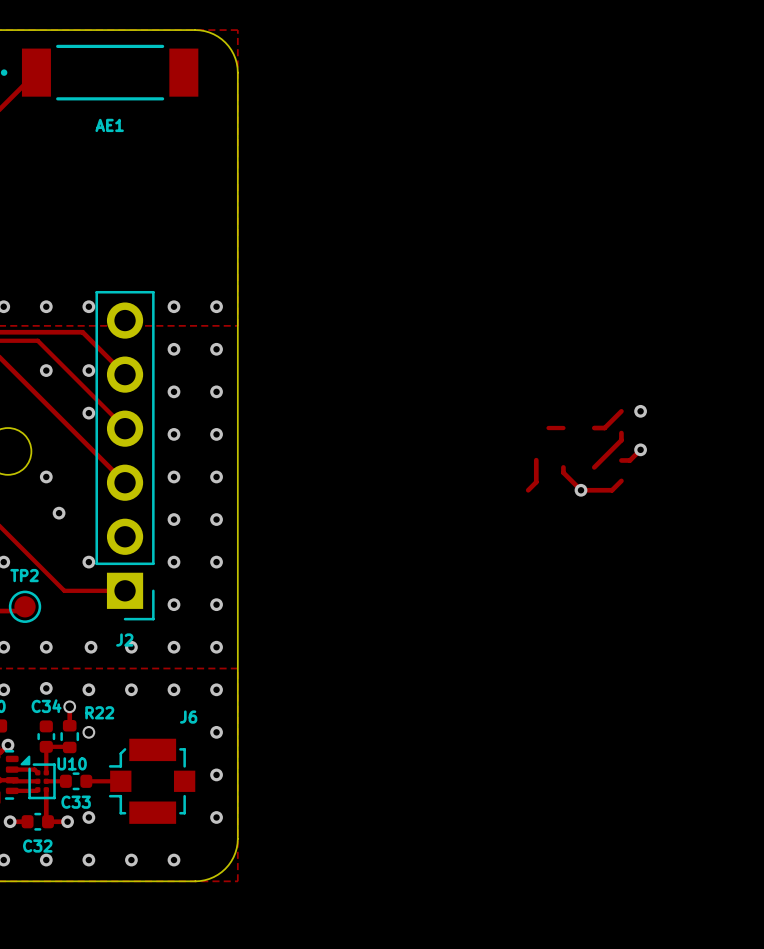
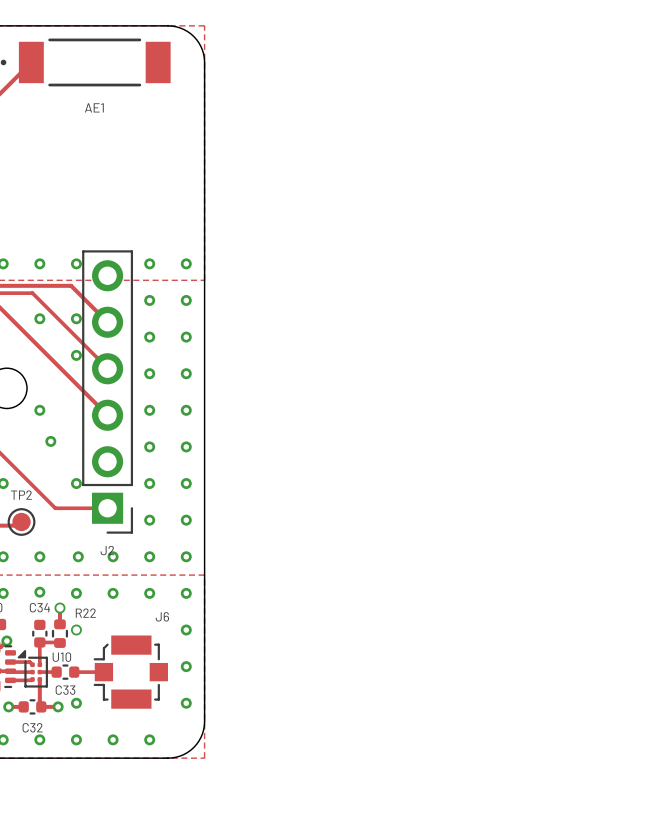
track: (621, 411) (604, 428) (594, 428) -> none
via: (640, 411) -> none
track: (548, 428) (563, 428) -> none
track: (621, 433) (621, 440) (594, 467) -> none
track: (640, 449) (629, 460) (621, 460) -> none
via: (640, 449) -> none
track: (536, 460) (536, 482) (528, 490) -> none
track: (563, 467) (563, 472) (581, 490) (612, 490) (621, 480) -> none
via: (581, 490) -> none

